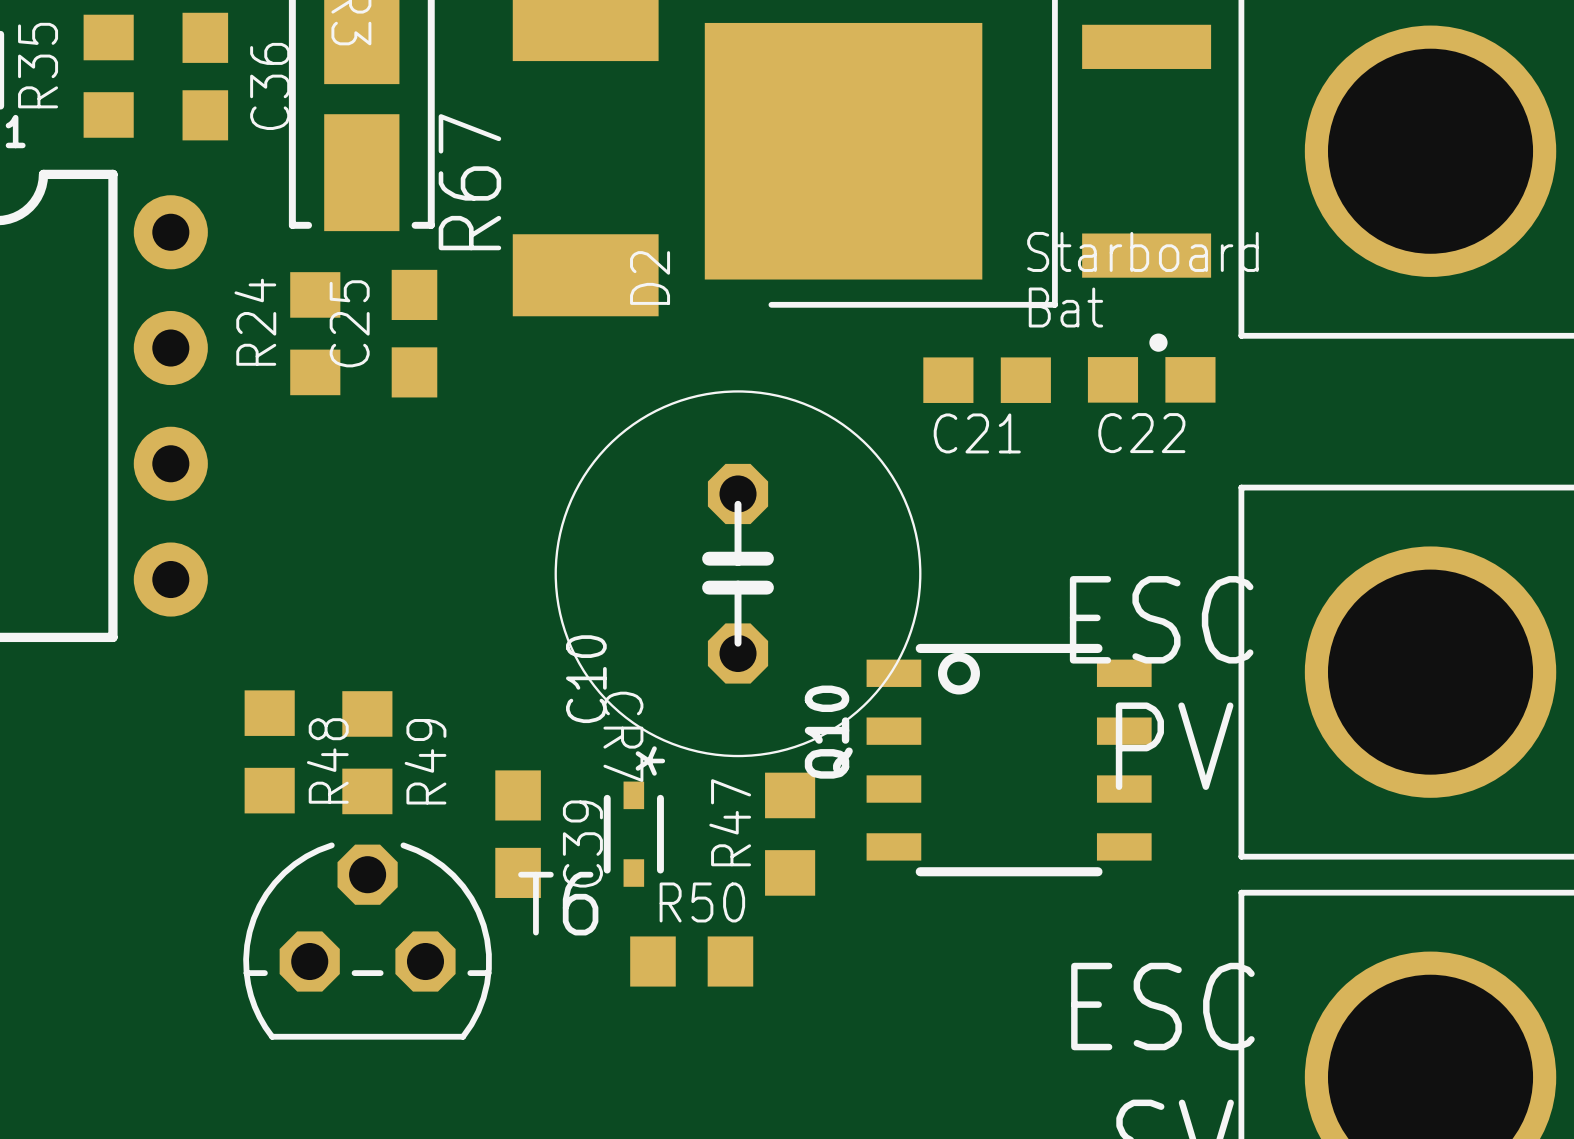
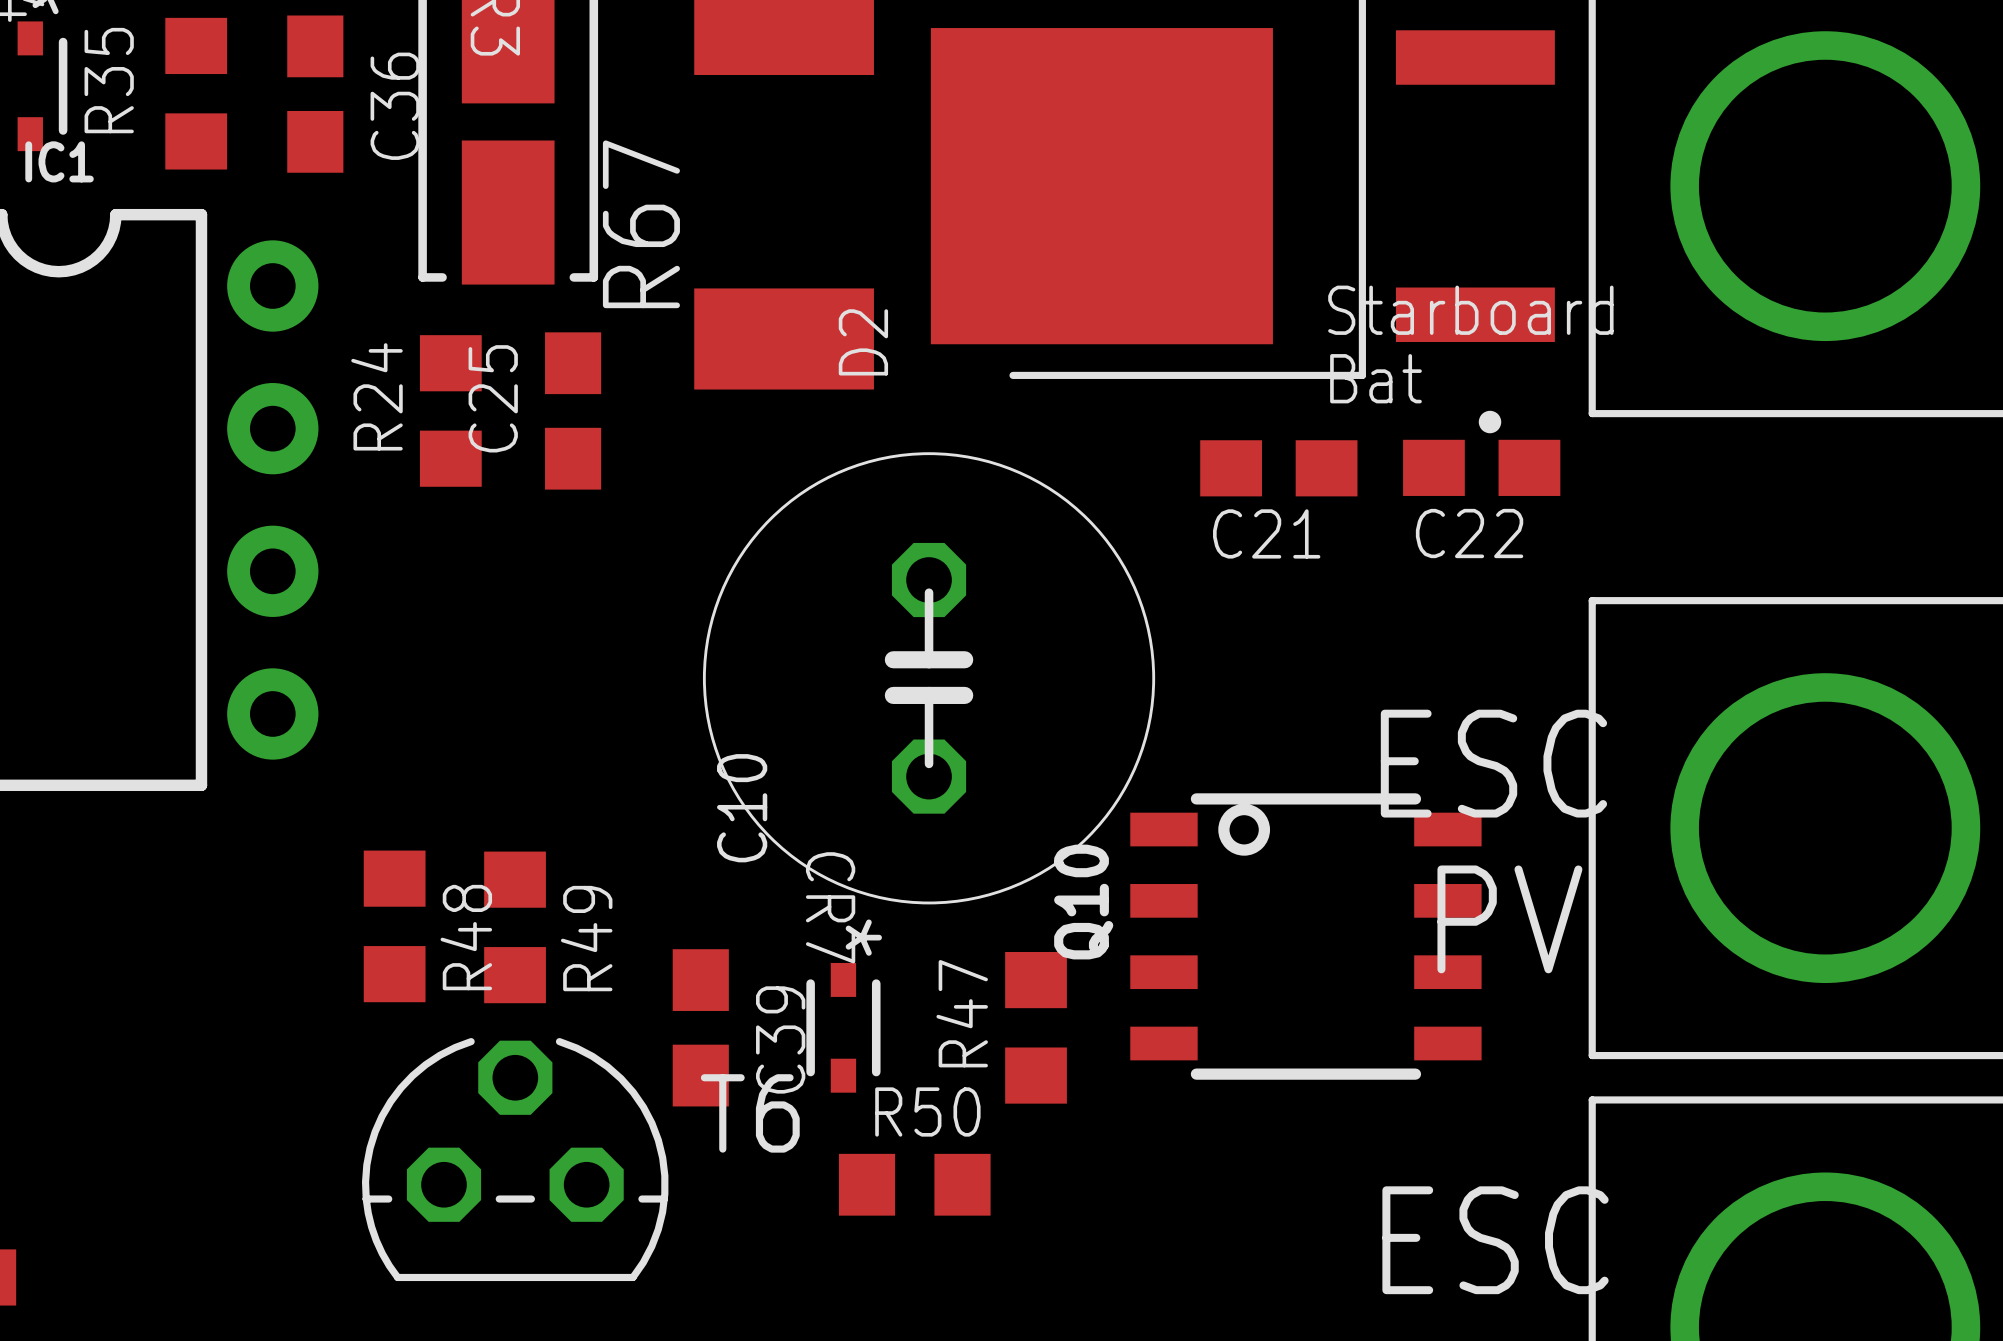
C10 position: (738, 573) -> (929, 678)

